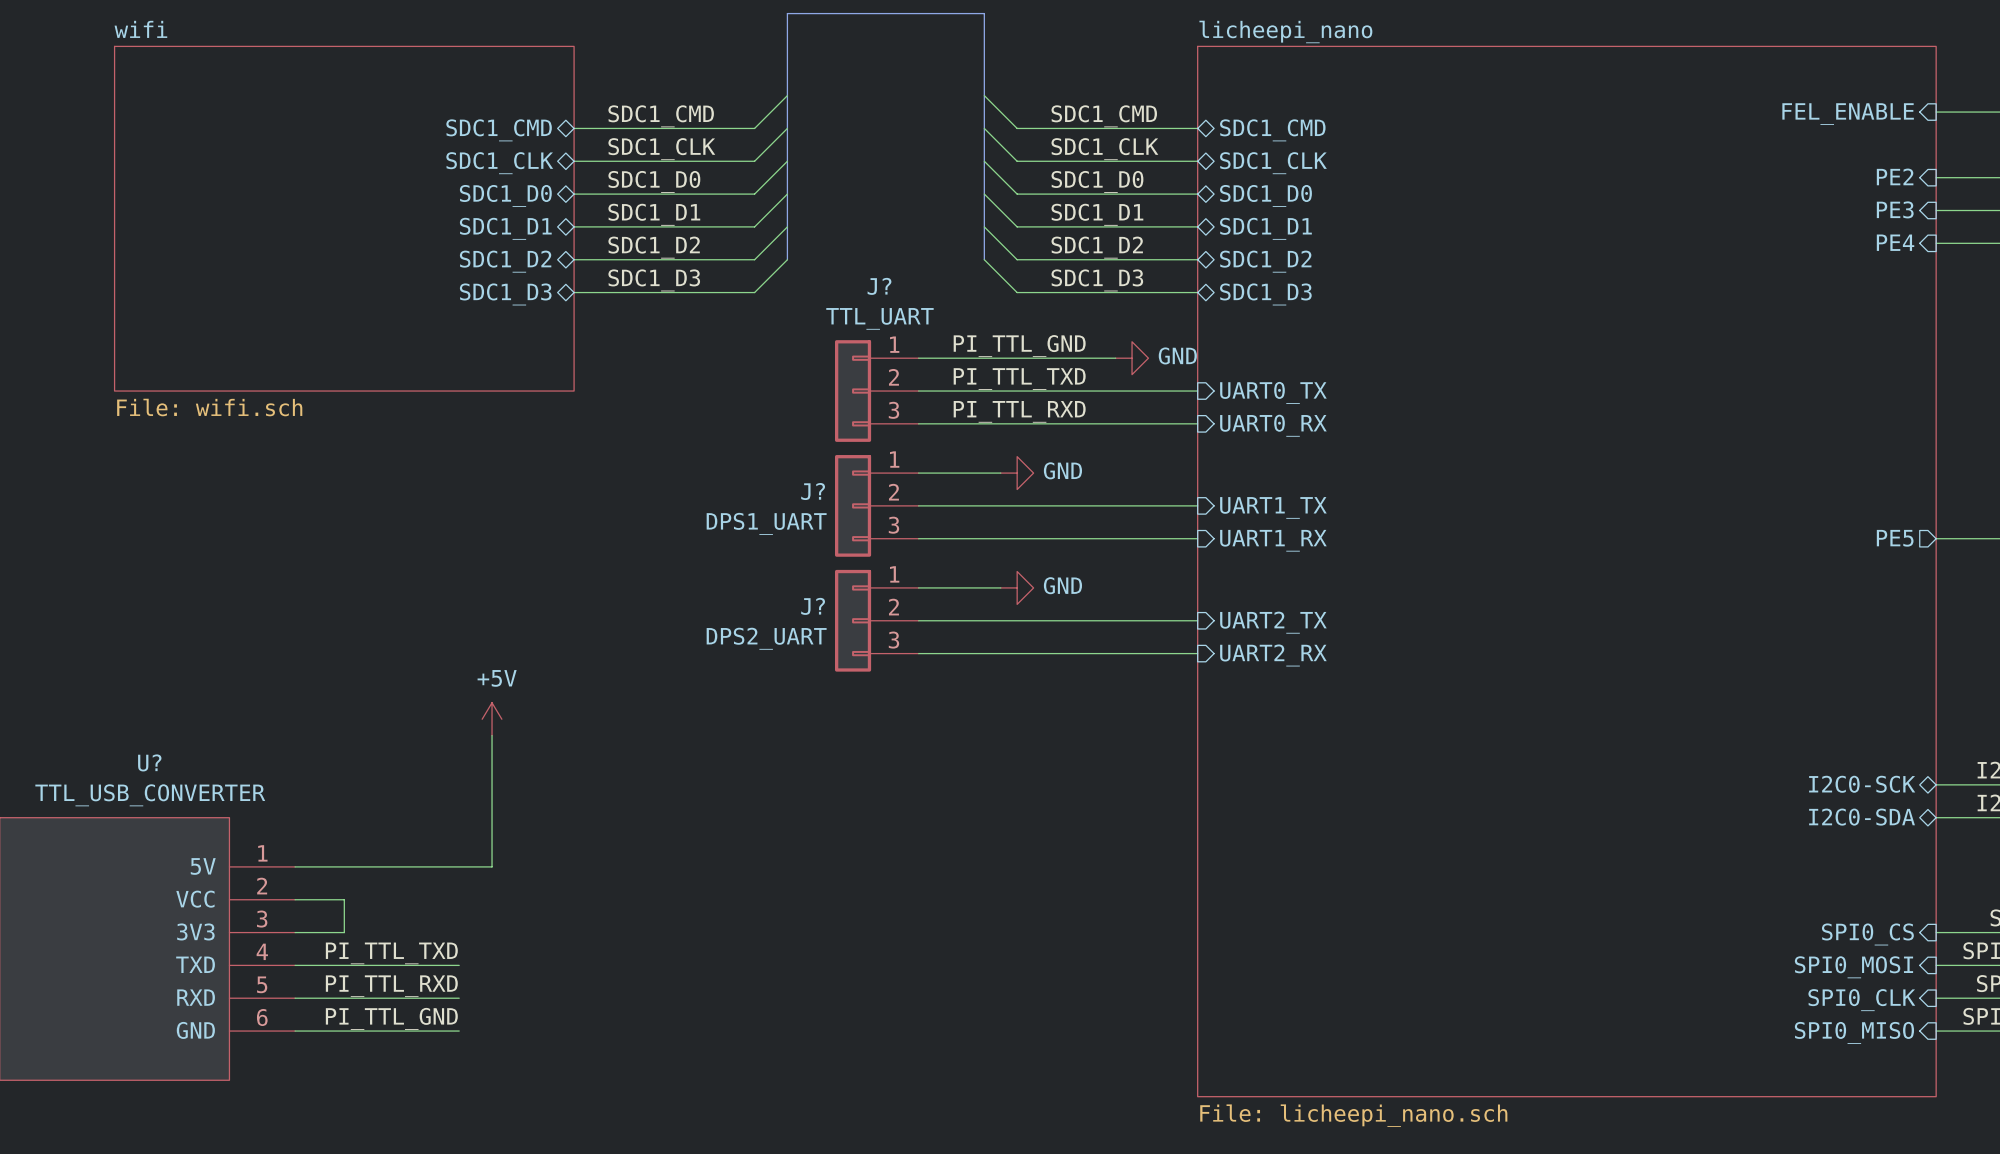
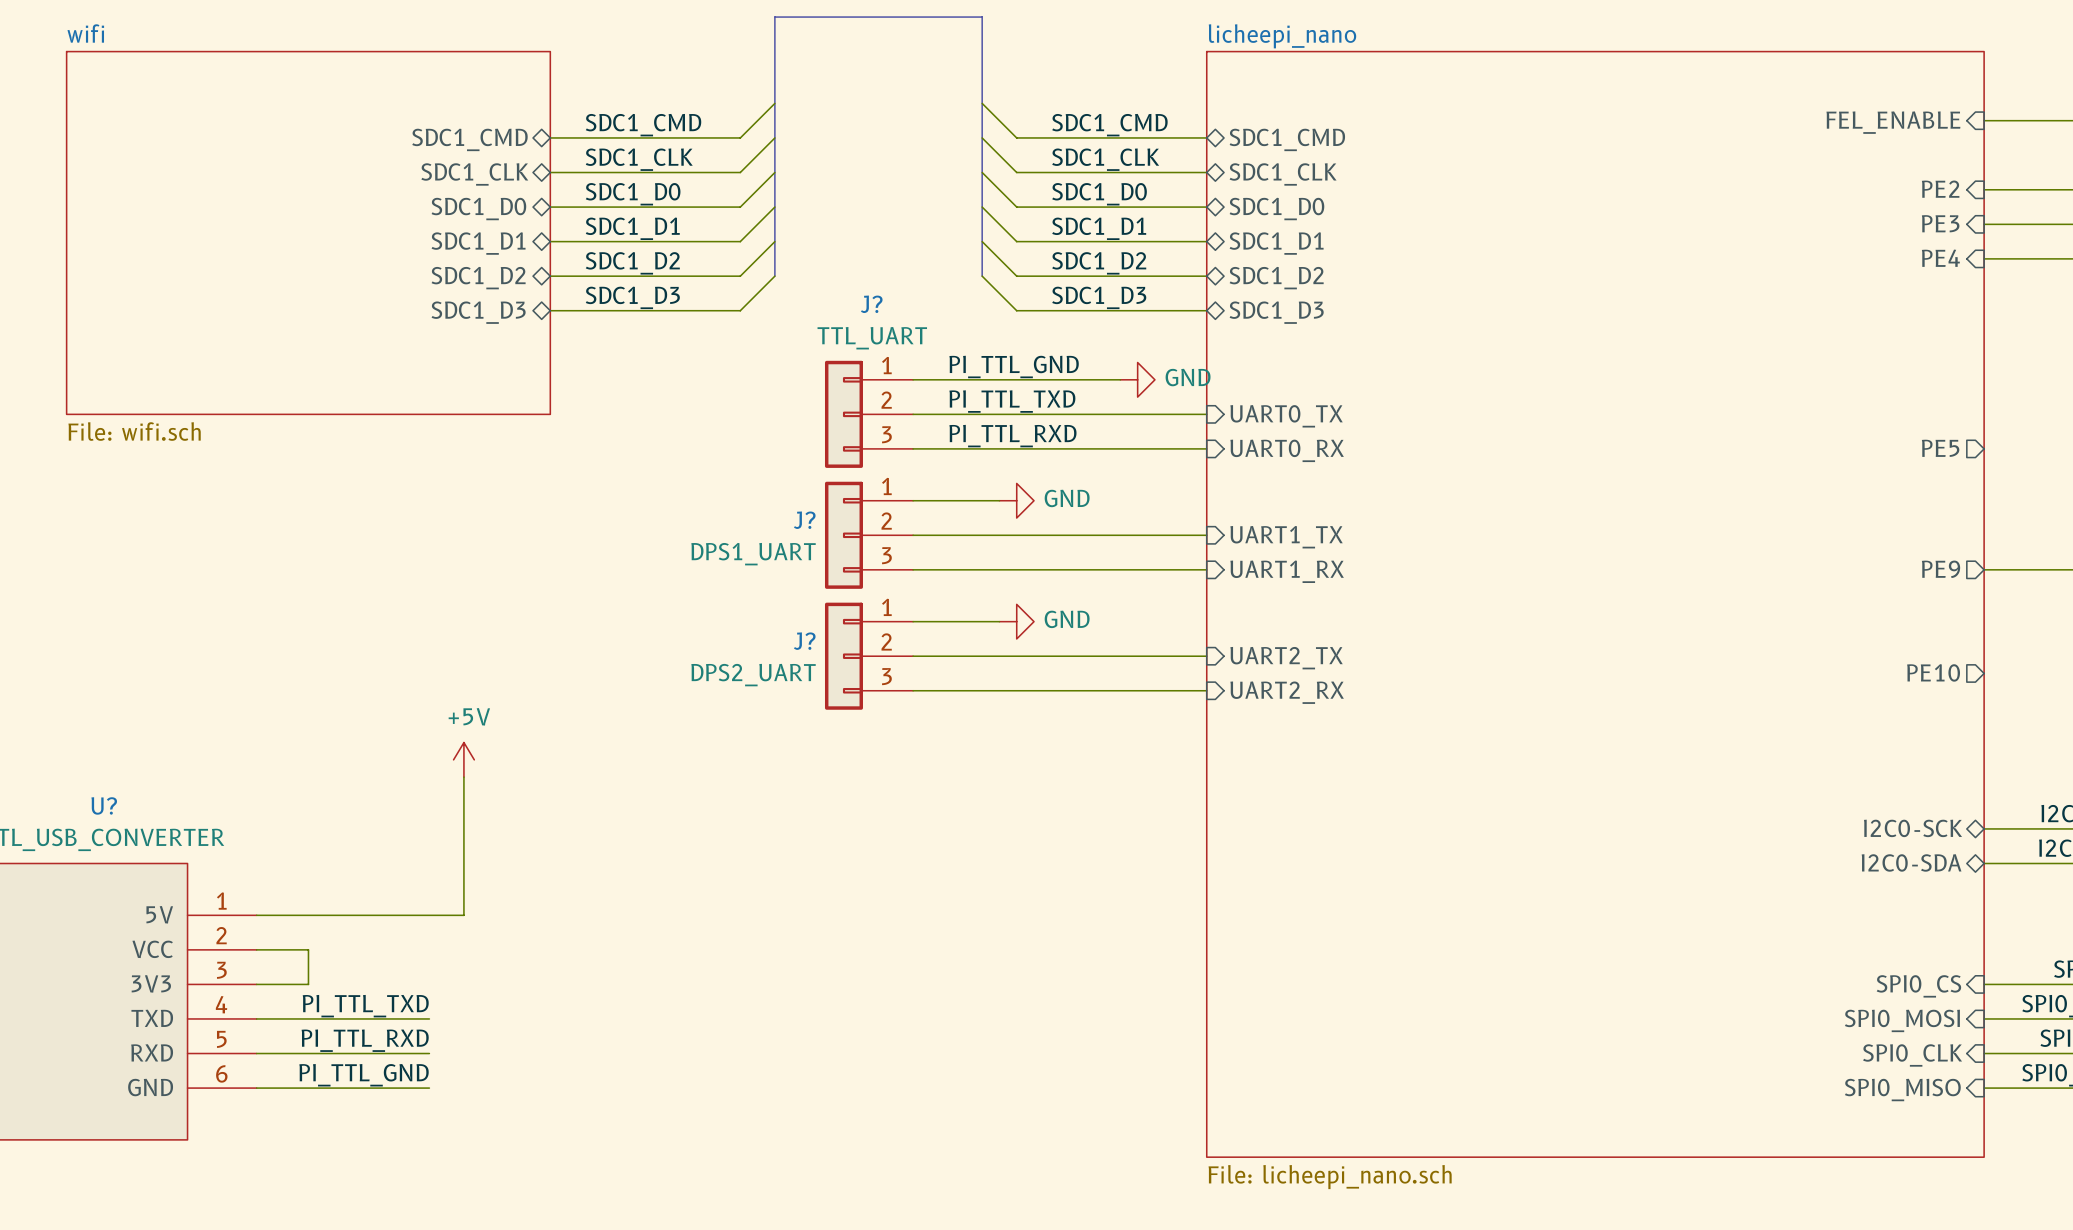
sheet pin: none -> PE5 (1940, 448)
sheet pin: PE5 (1895, 538) -> PE9 (1941, 569)
sheet pin: none -> PE10 (1933, 672)

